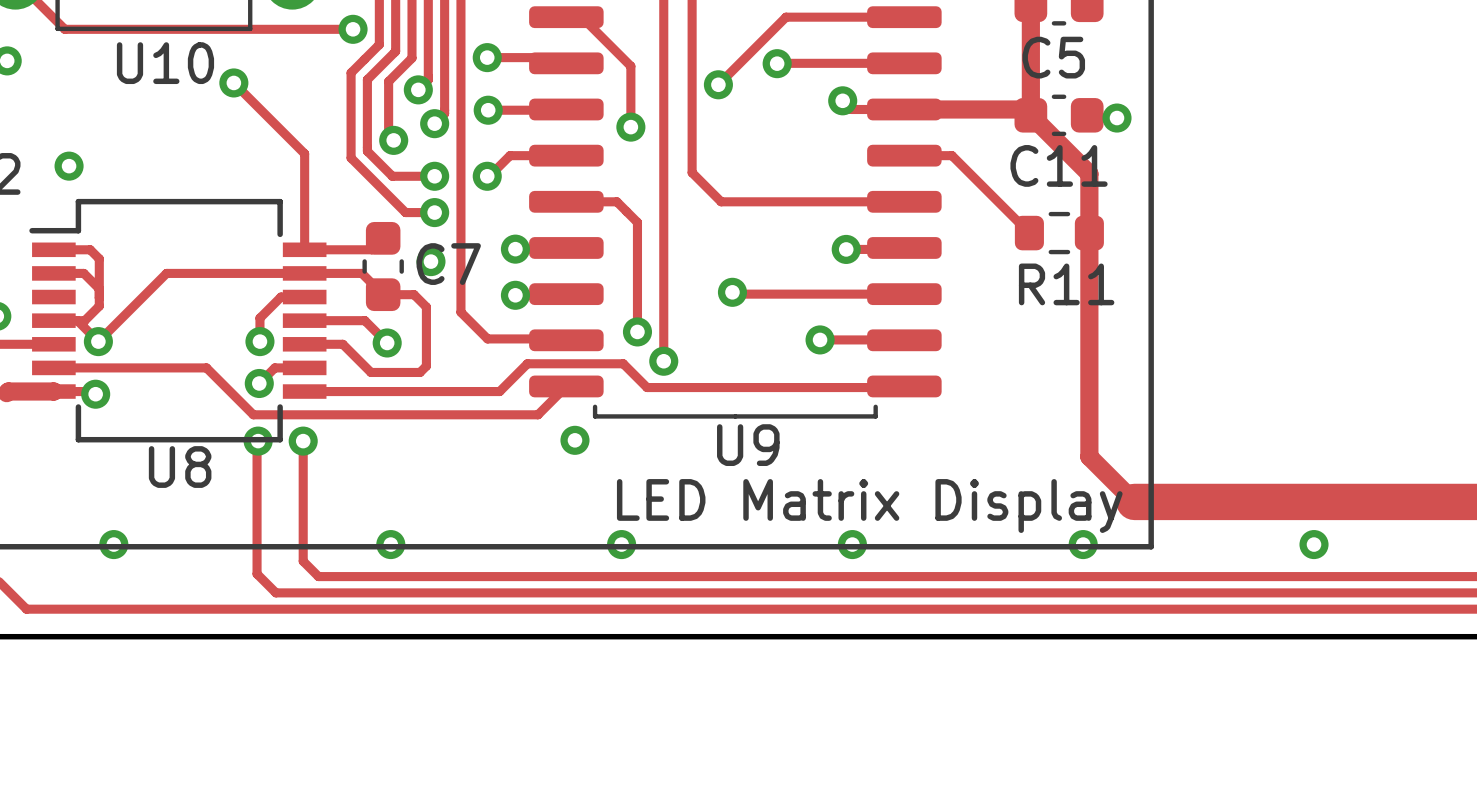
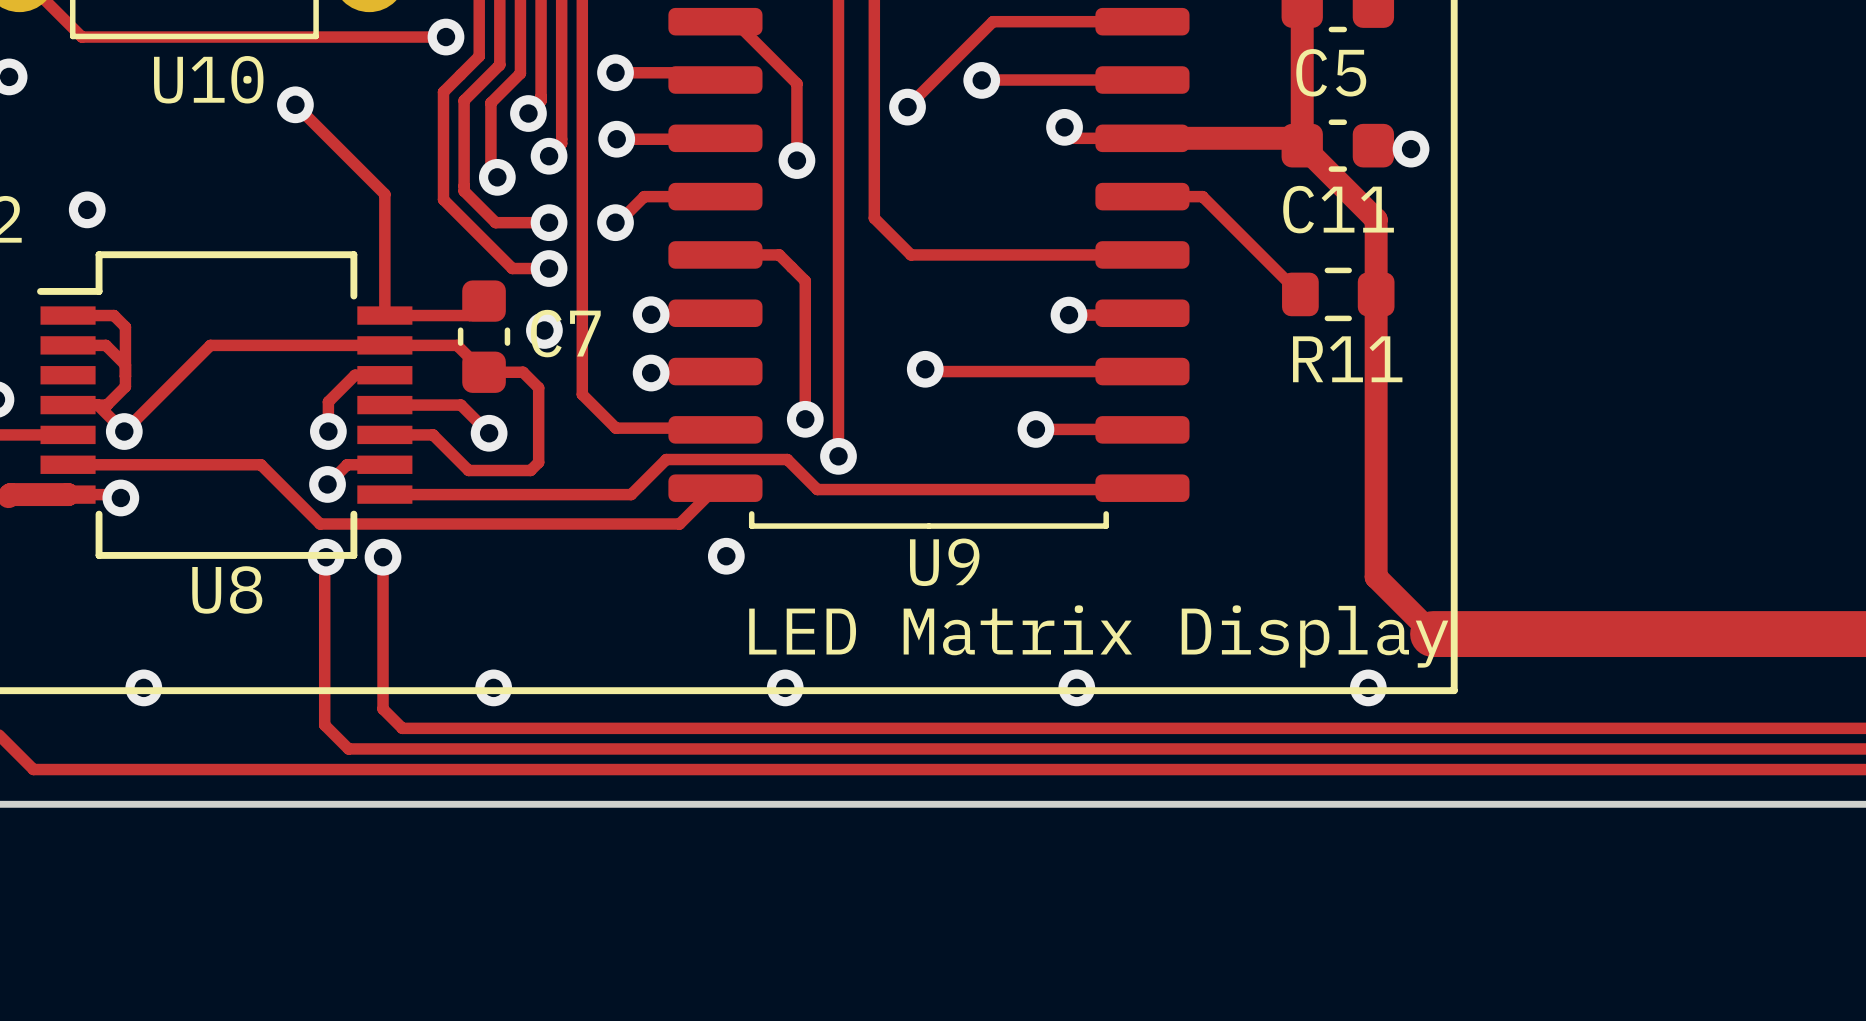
via: (1314, 544) -> none

